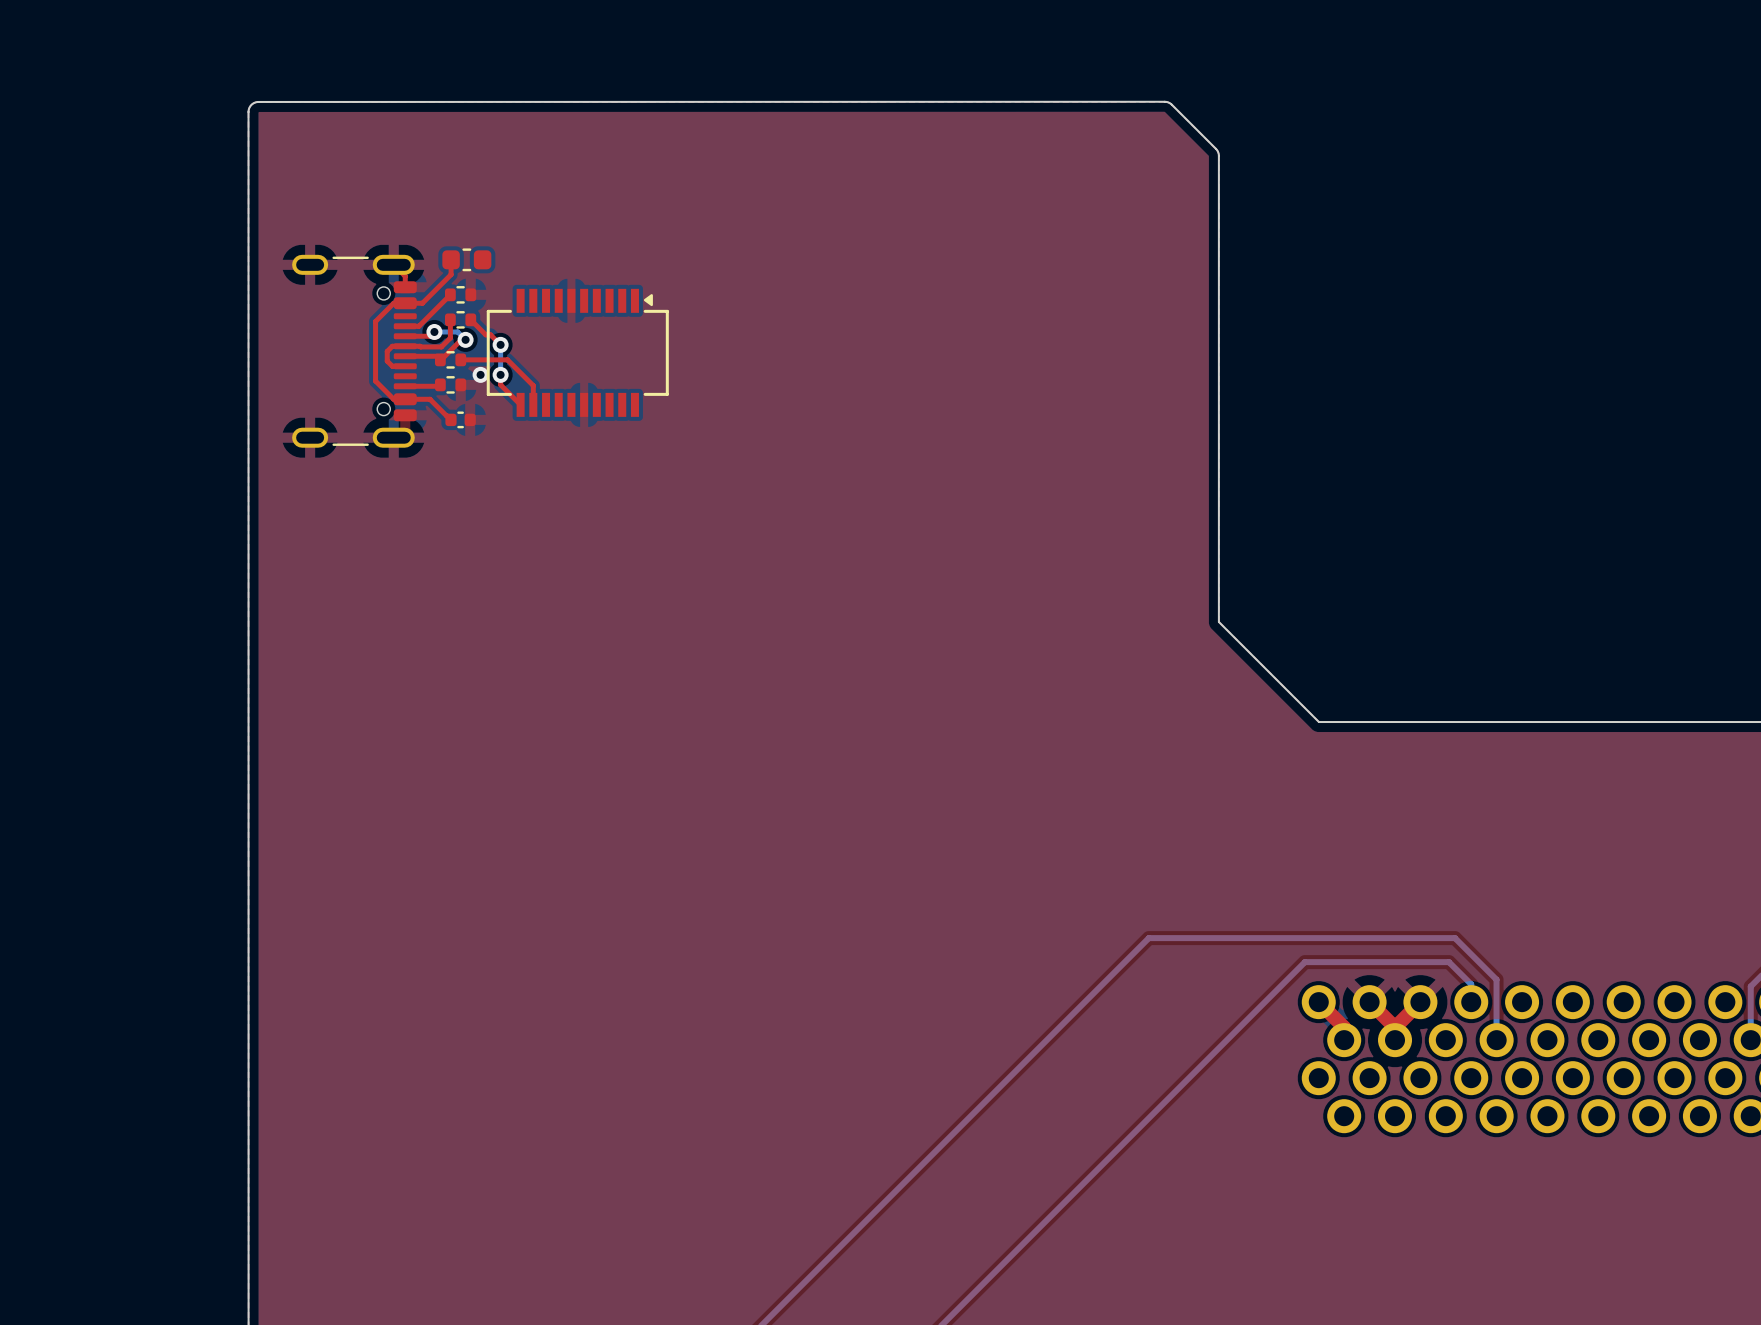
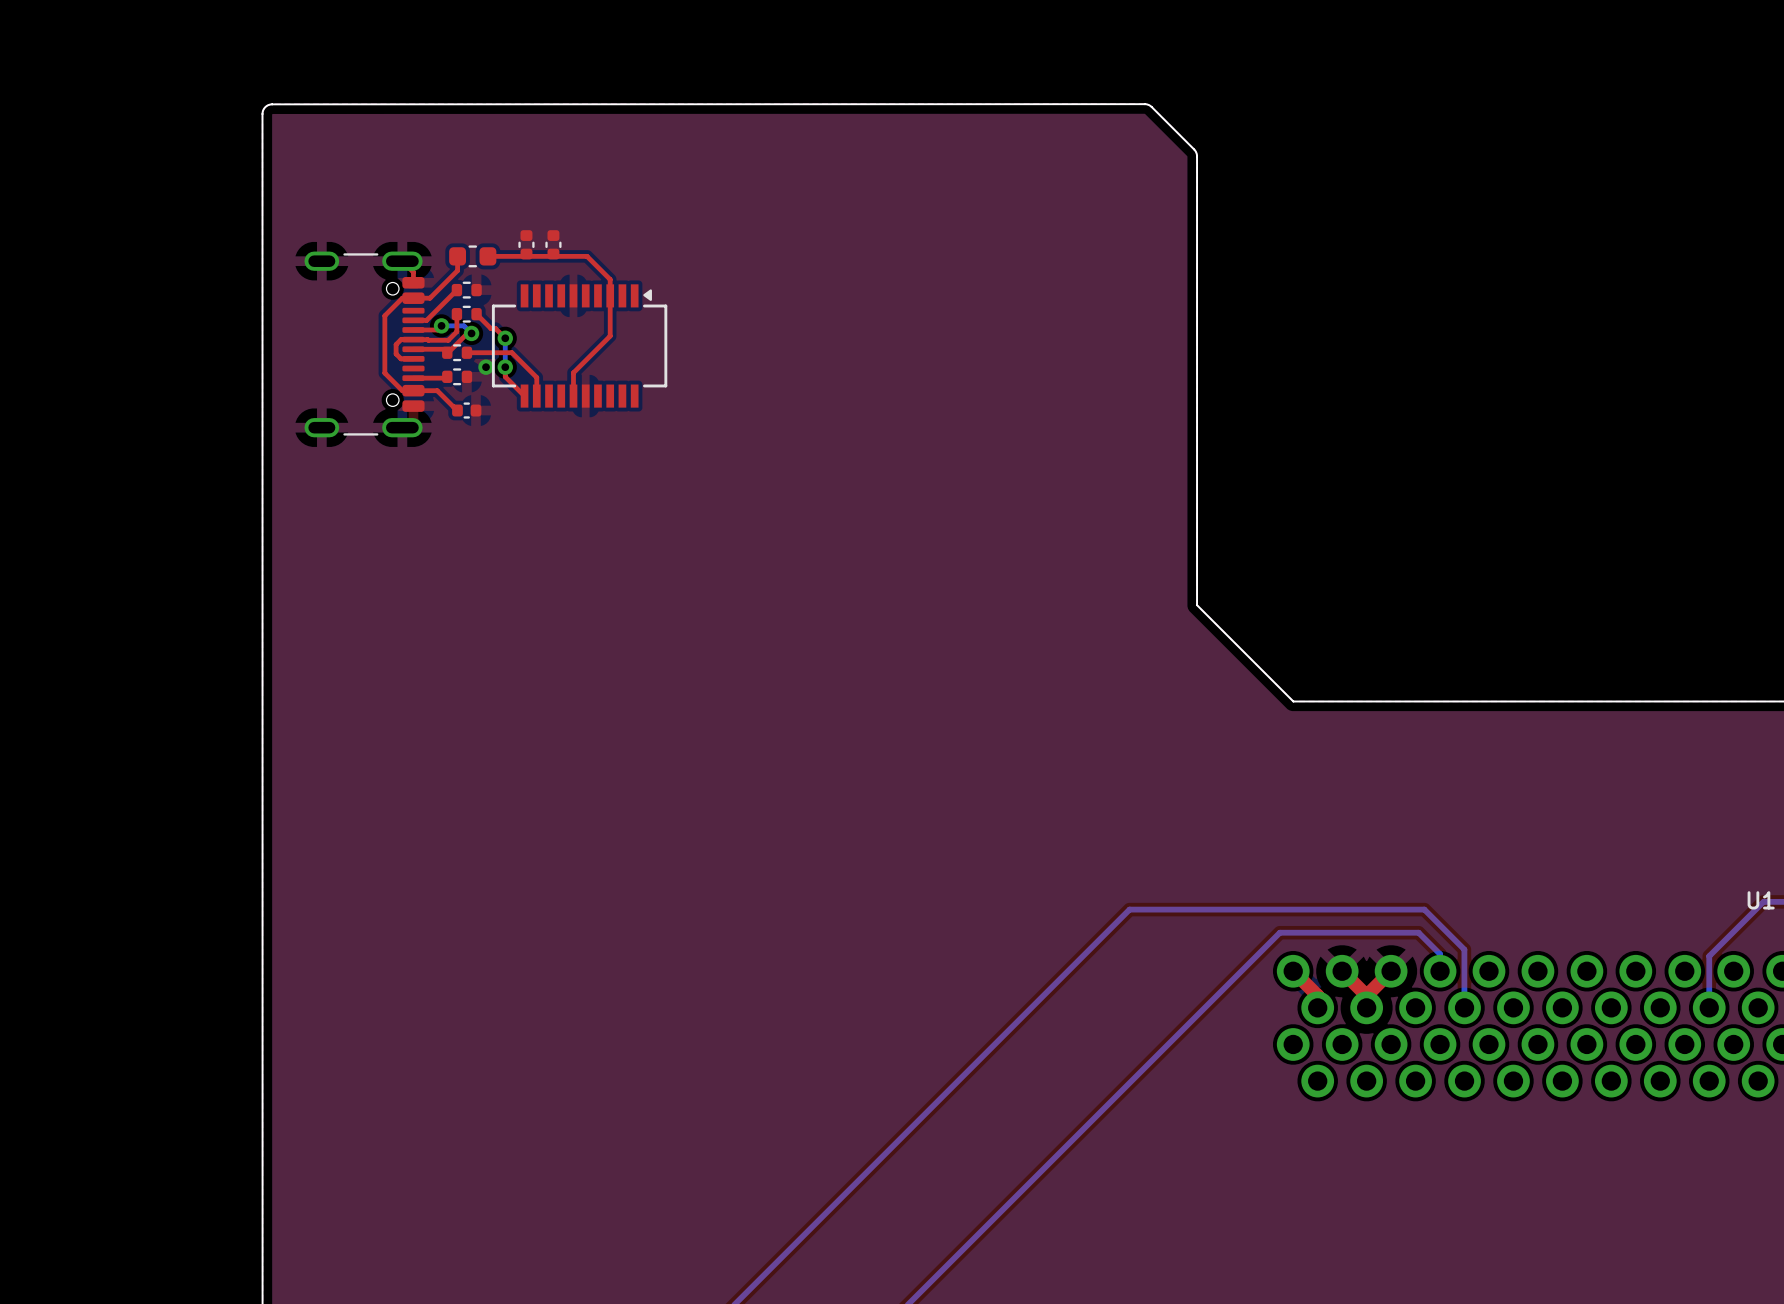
part: none -> (526, 244)
part: none -> (553, 244)
top track: none -> (487, 256) (587, 256) (610, 279) (610, 336) (573, 372) (573, 396)

